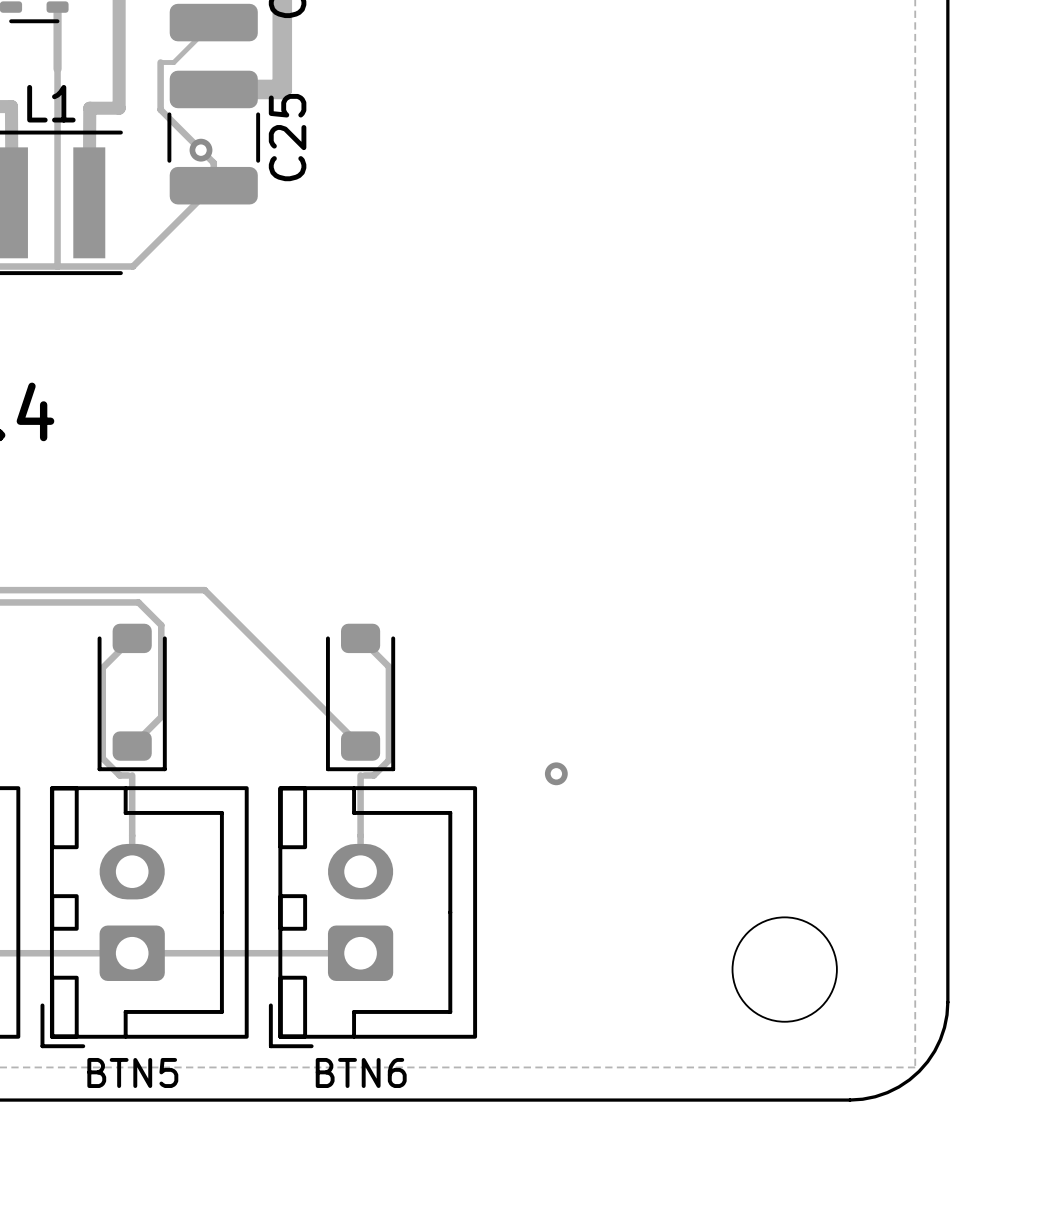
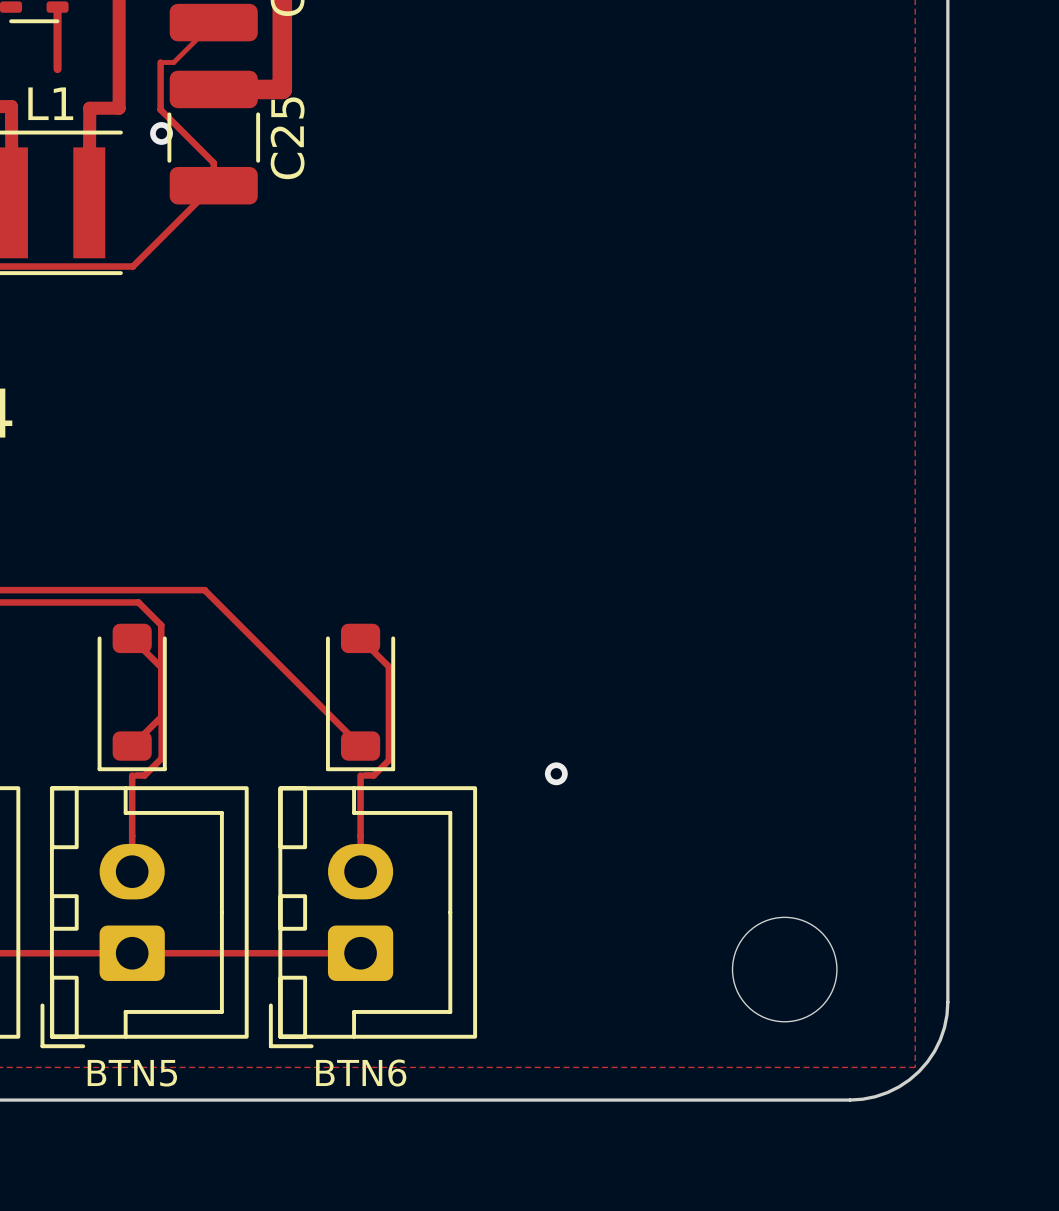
track: (57, 69) (57, 266) -> none
via position: (200, 150) -> (161, 133)
track: (132, 638) (102, 667) (102, 758) (119, 775) (132, 775) -> (132, 638) (161, 667) (161, 758) (144, 775) (132, 775)

